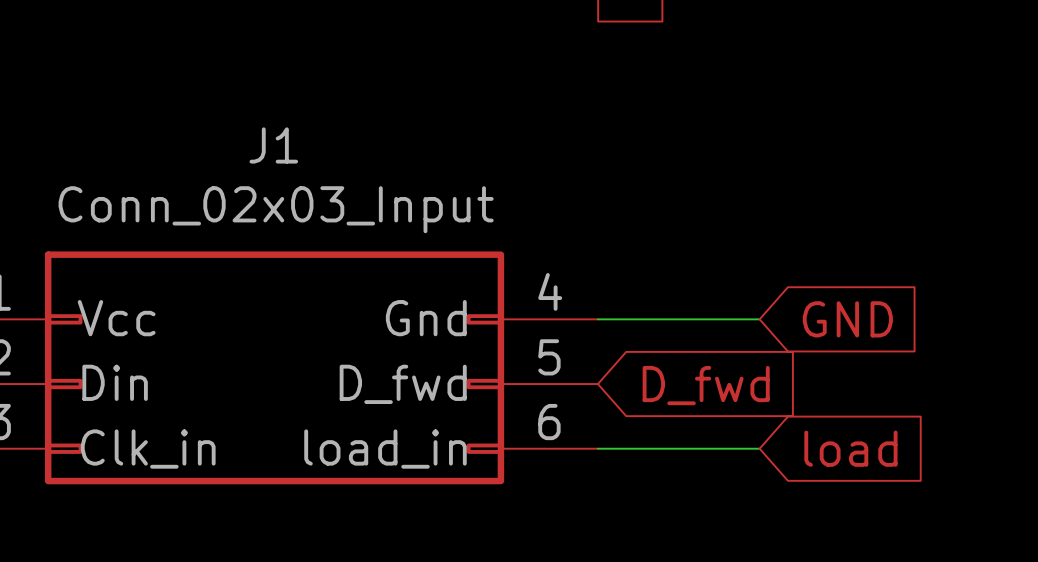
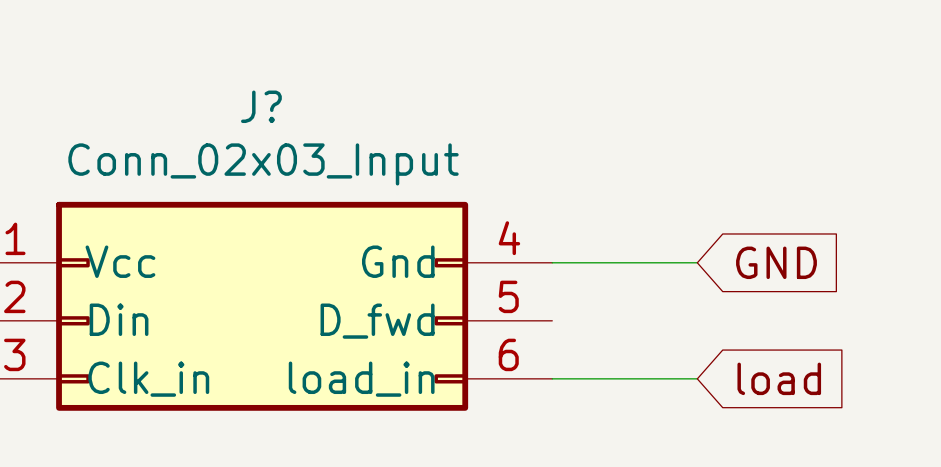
J1 name: J1 (273, 145) -> J? (261, 106)
global label: D_fwd (706, 385) -> none

